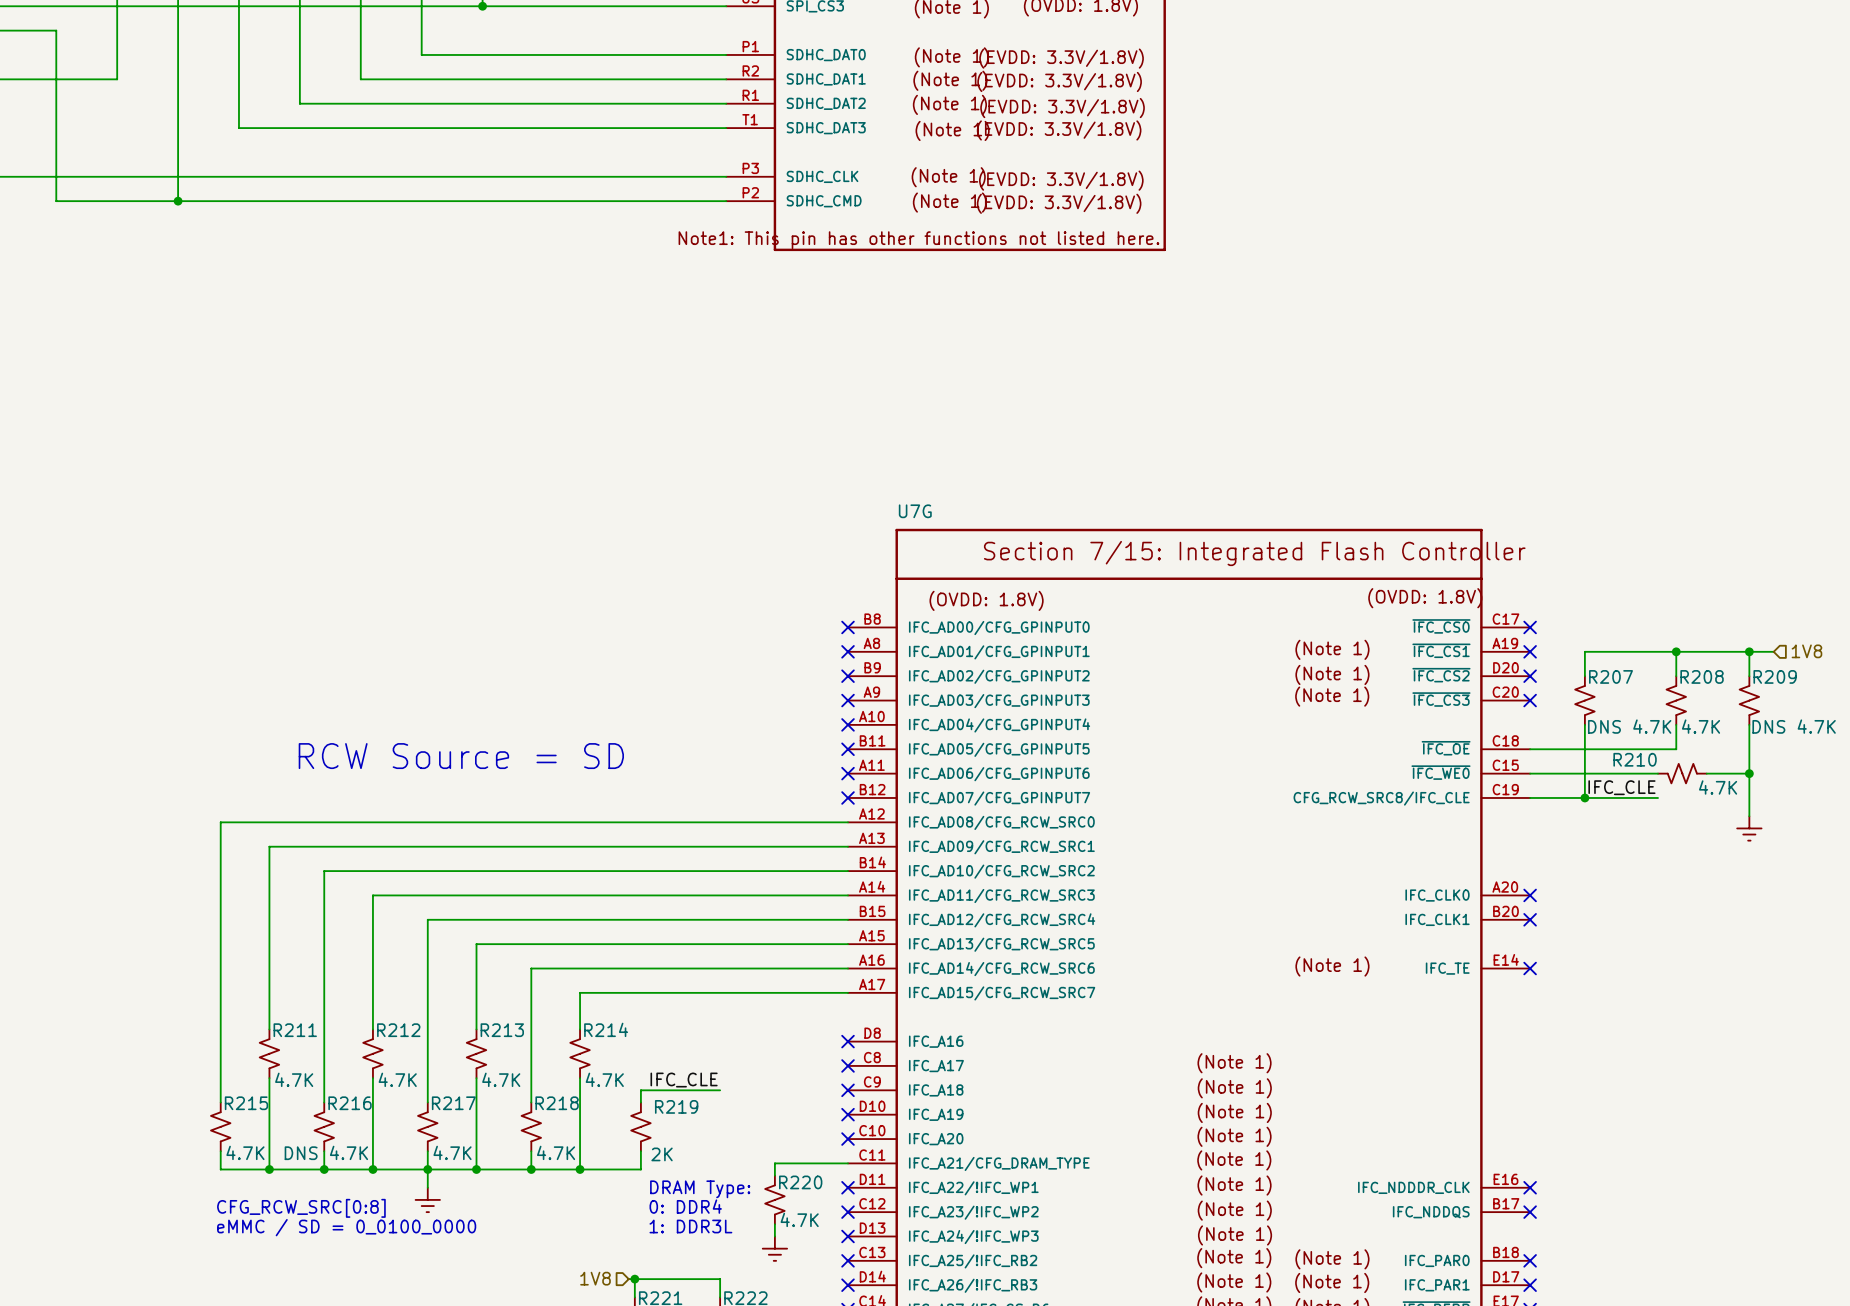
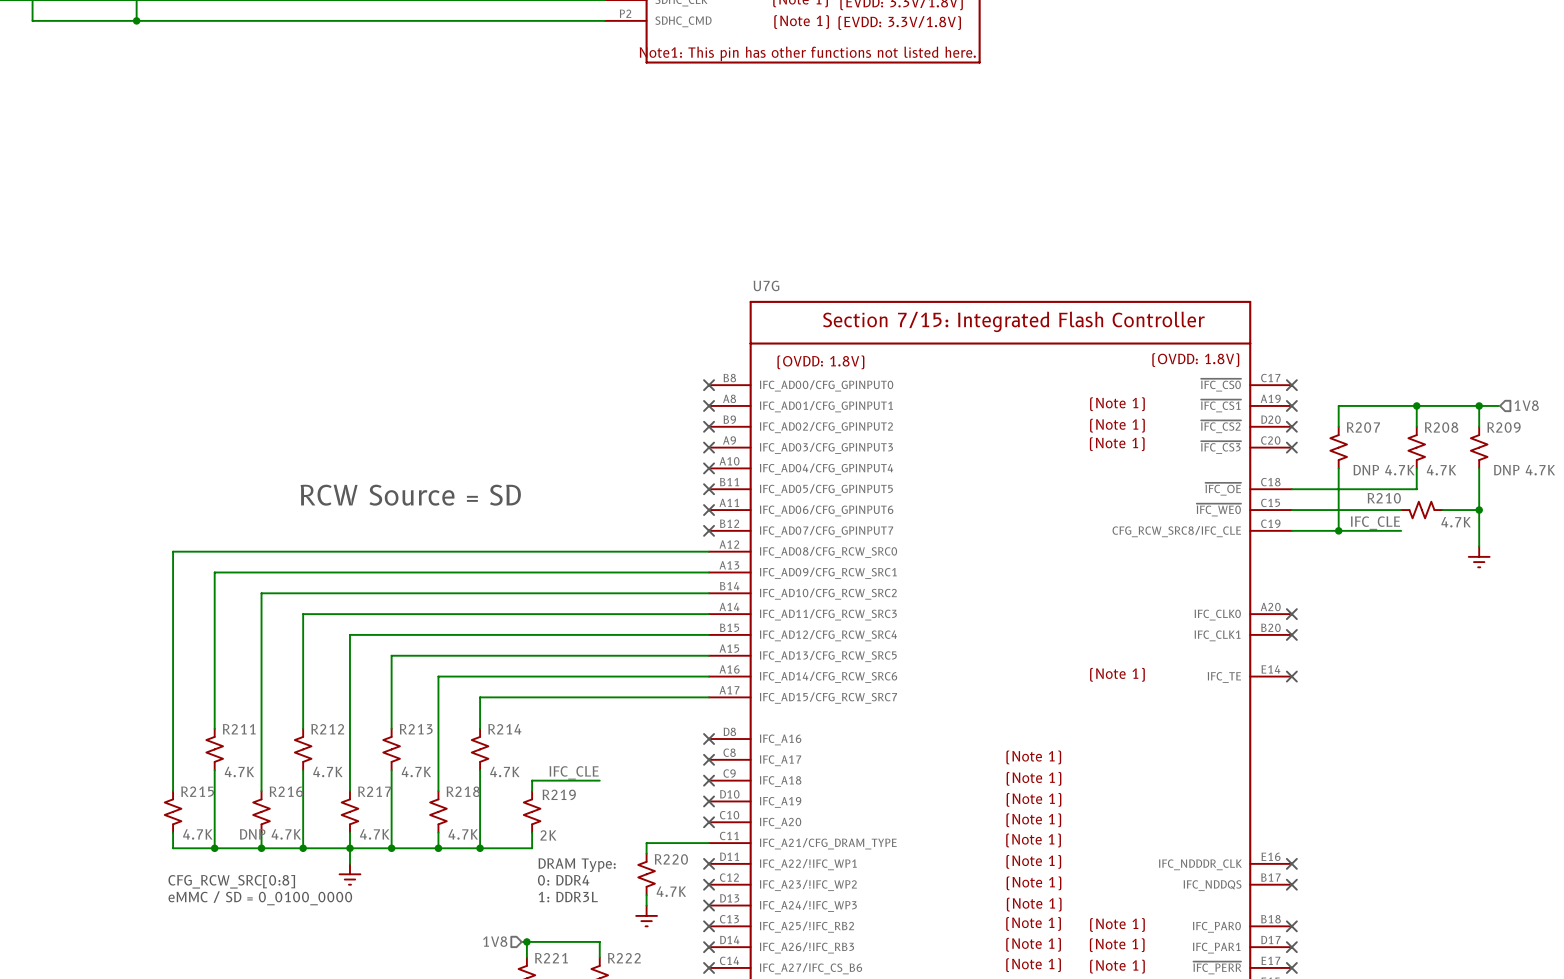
R207 value: DNS 4.7K (1629, 726) -> DNP 4.7K (1384, 470)
R209 value: DNS 4.7K (1794, 726) -> DNP 4.7K (1524, 470)
R216 value: DNS 4.7K (326, 1152) -> DNP 4.7K (270, 834)

